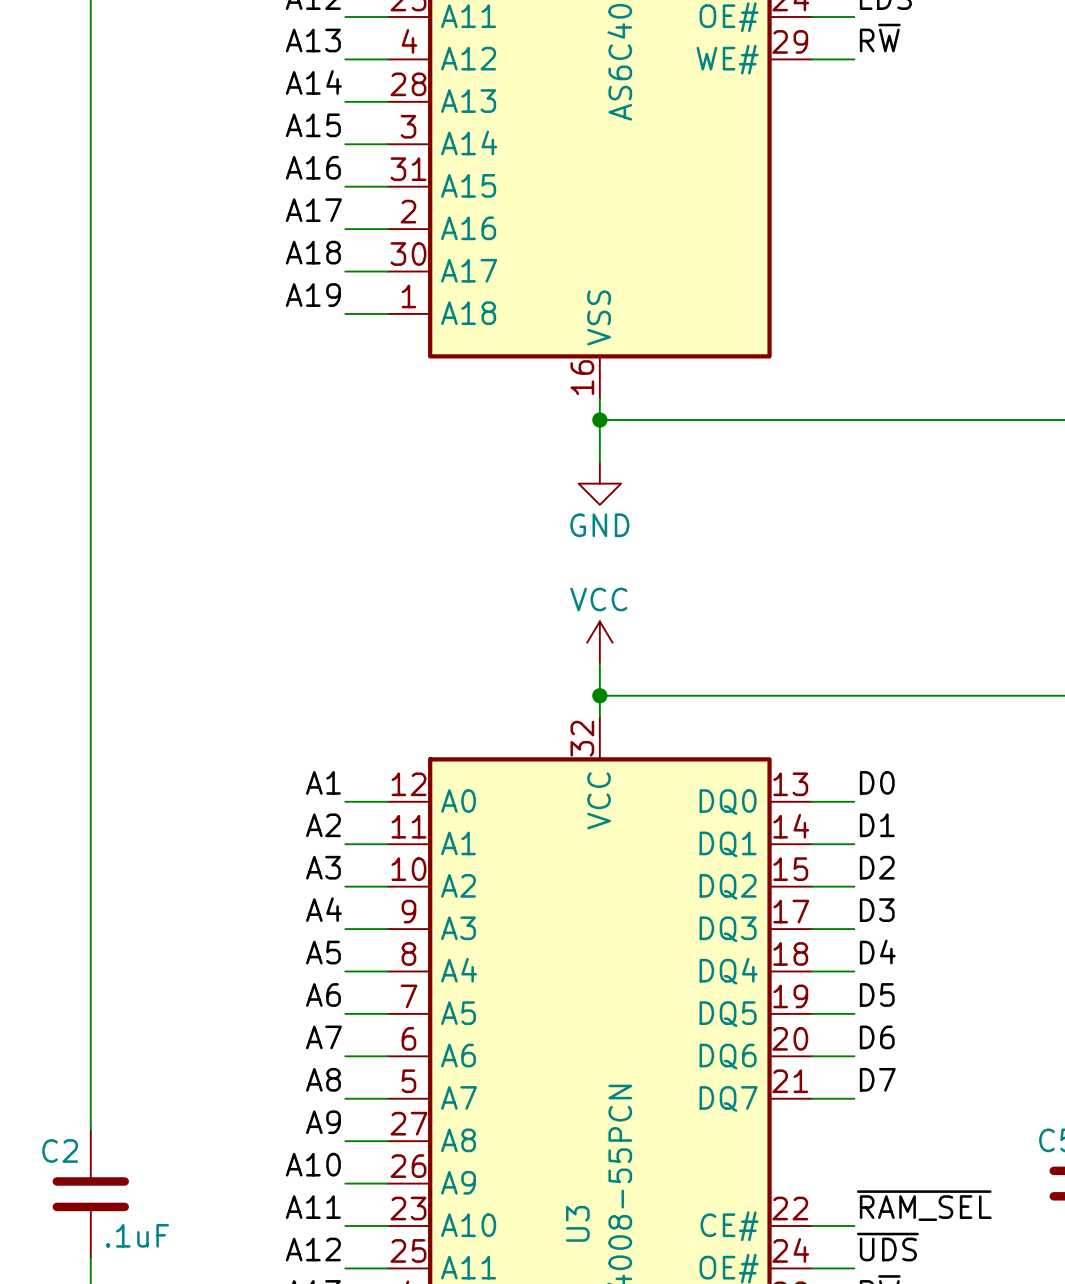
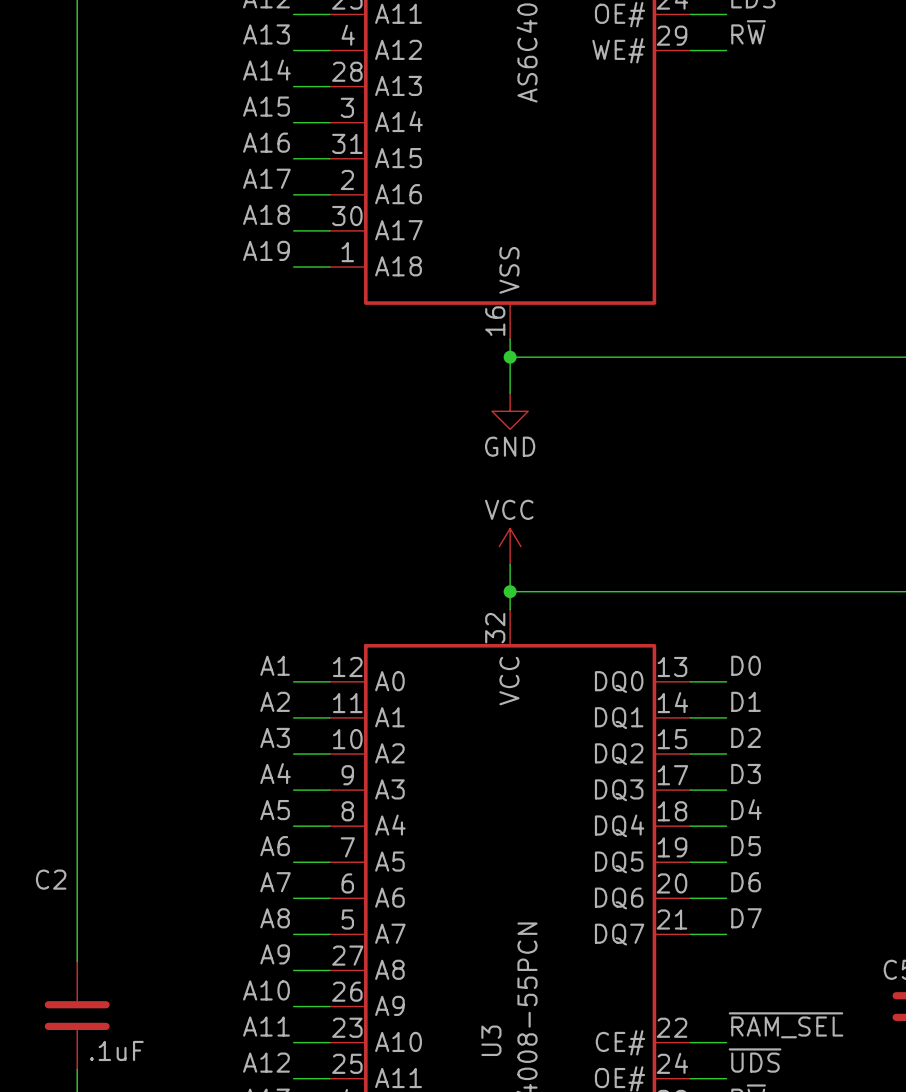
C2 name position: C2 (60, 1150) -> C2 (51, 879)

